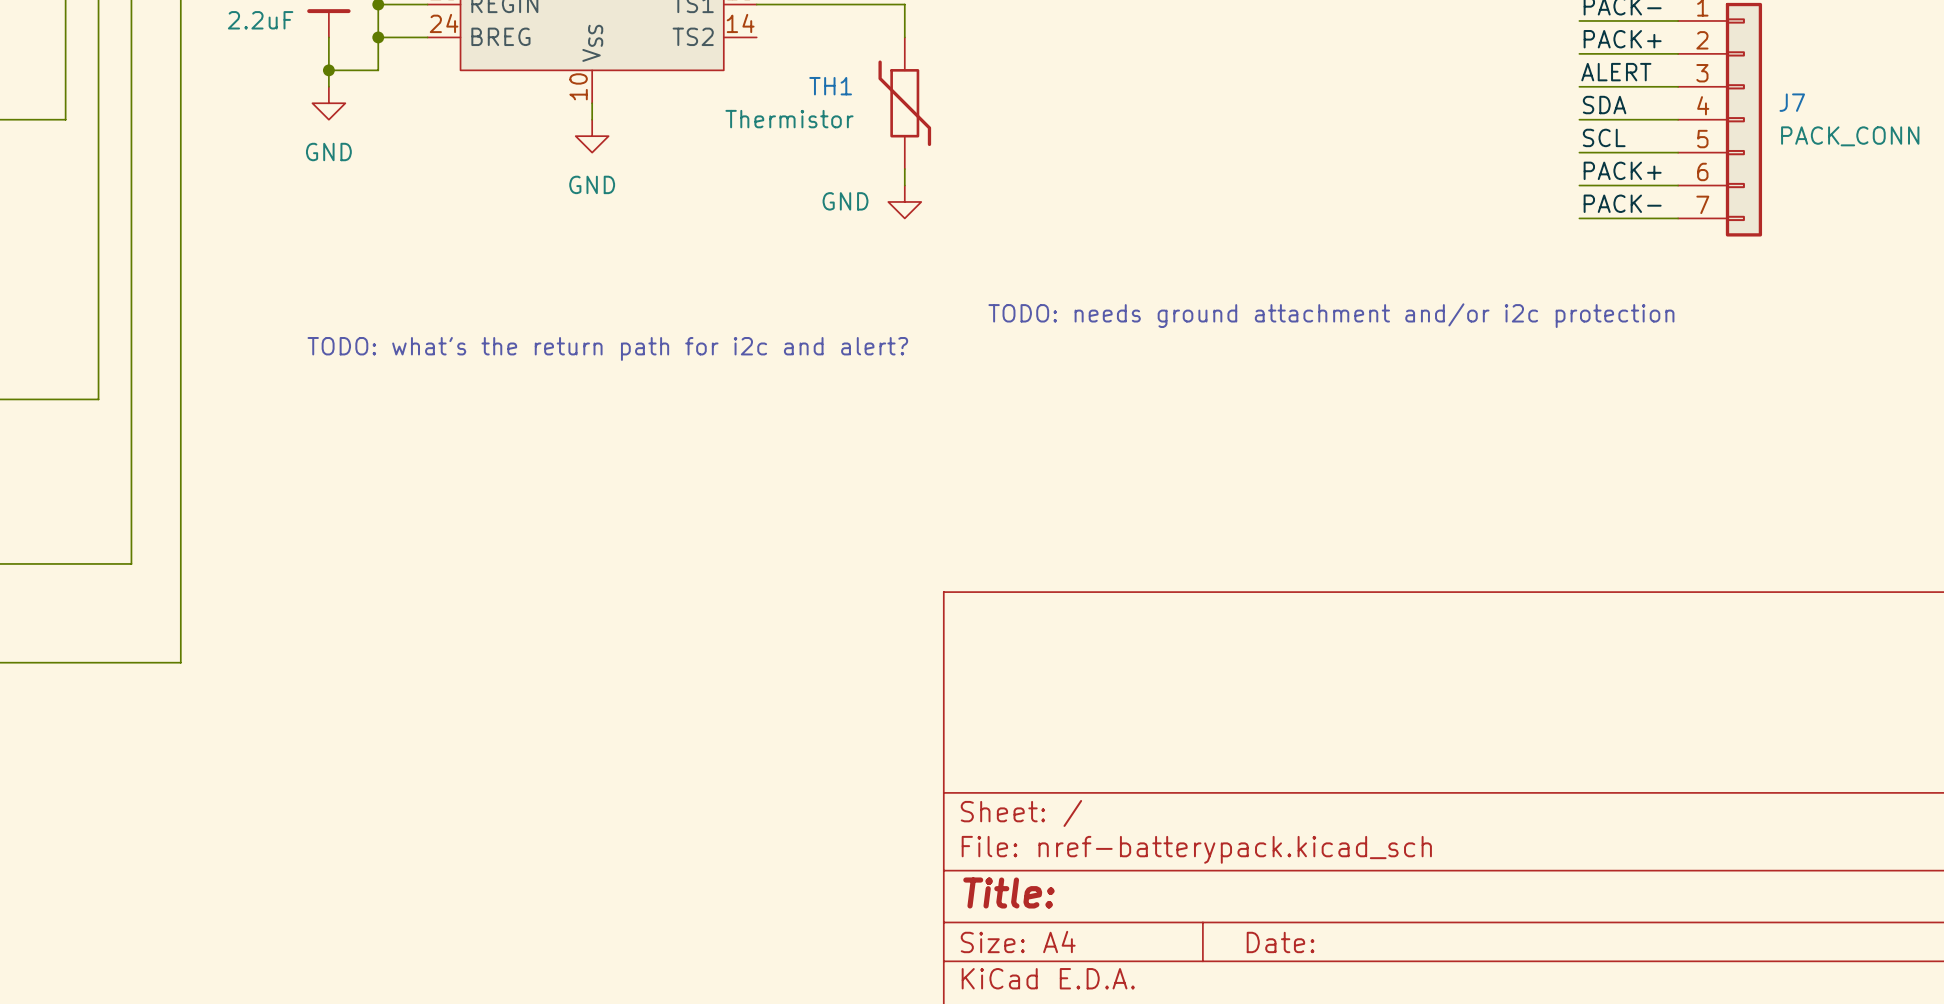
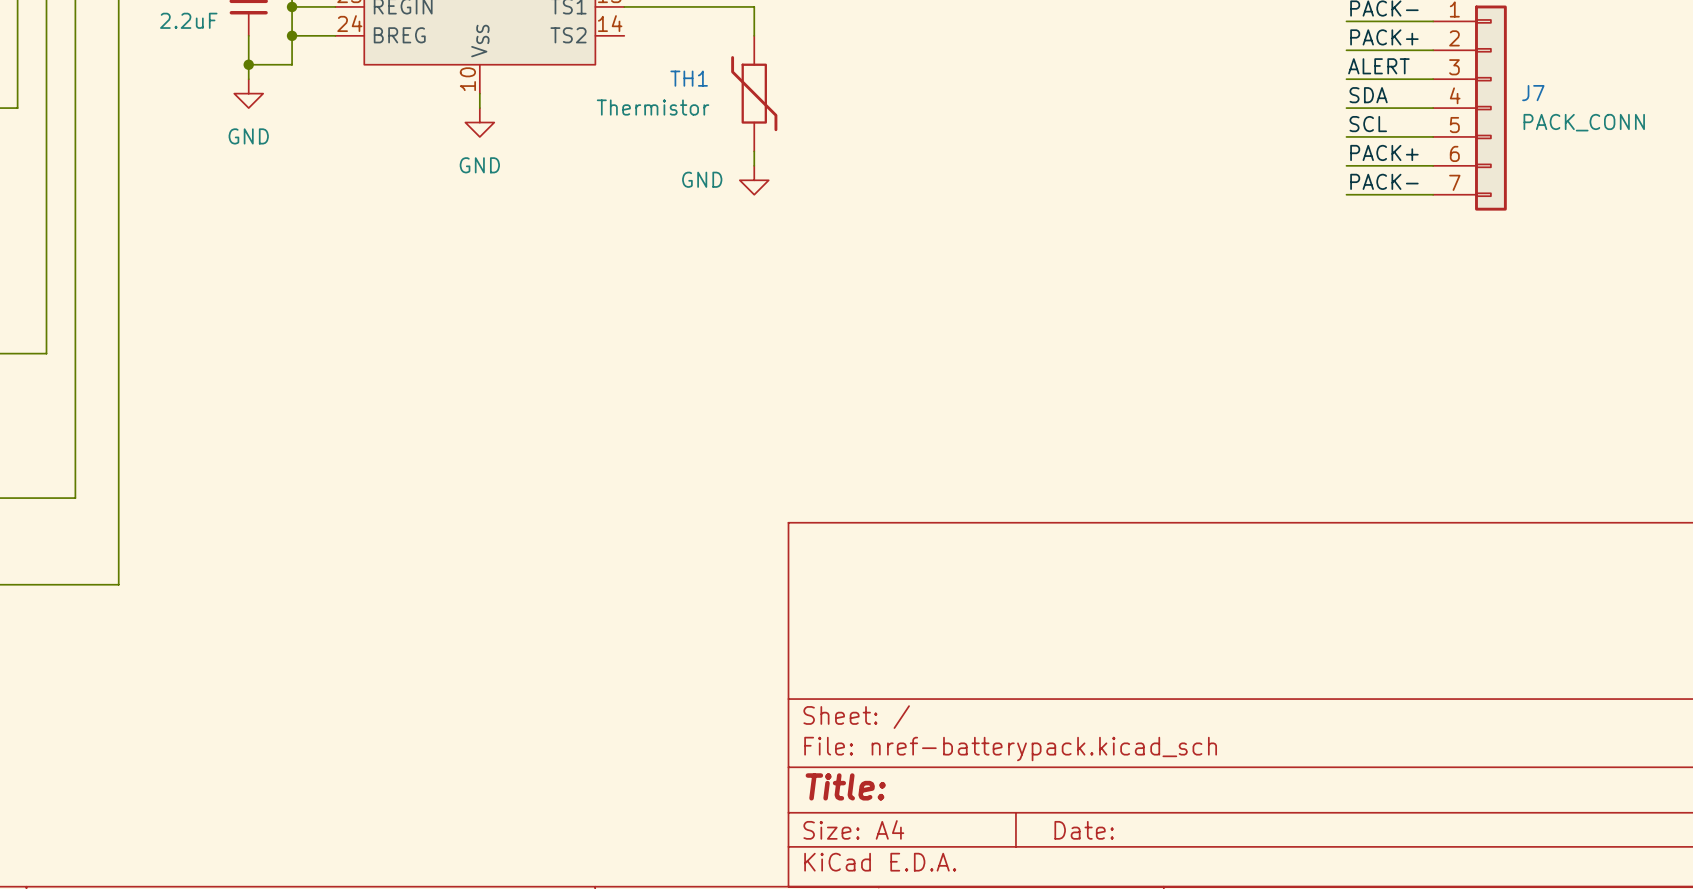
text: TODO: needs ground attachment and/or i2c protection (1331, 315) -> none
text: TODO: what's the return path for i2c and alert? (607, 348) -> none

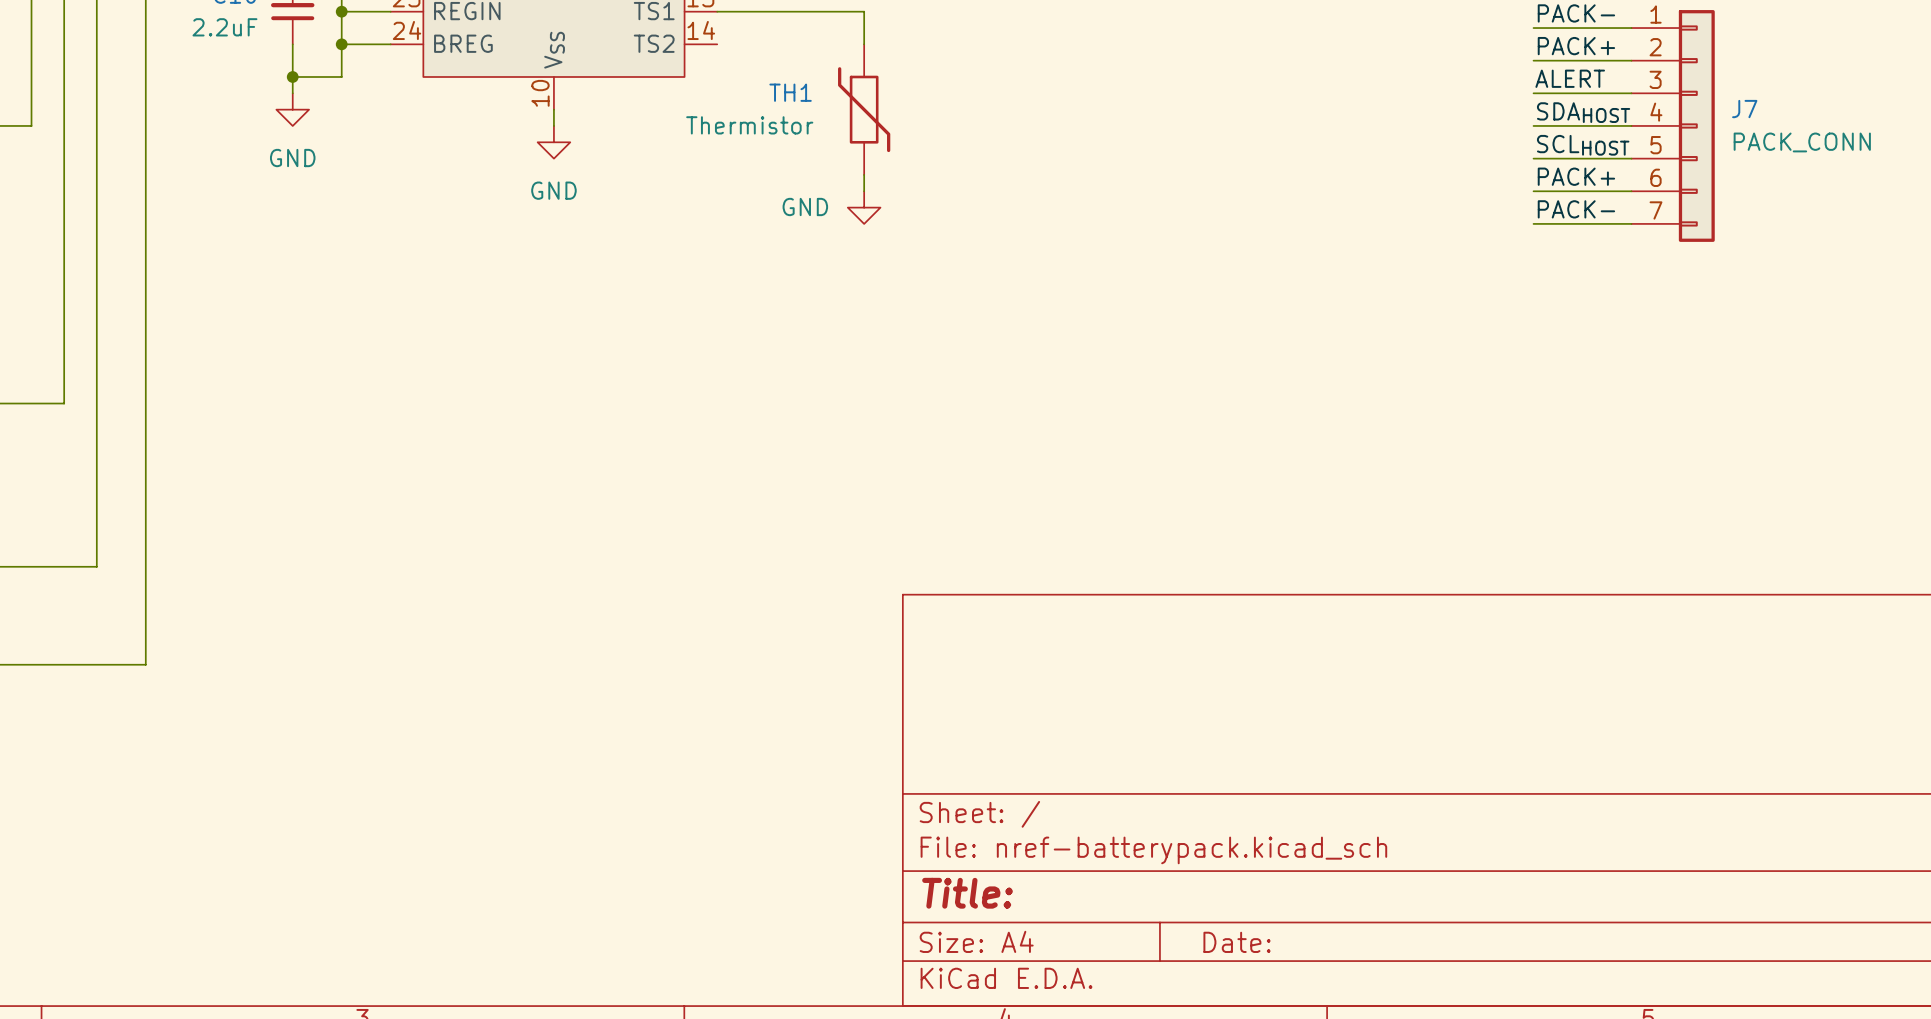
label: SDA (1368, 95) -> SDAHOST (1583, 112)
label: SCL (1368, 124) -> SCLHOST (1583, 145)

